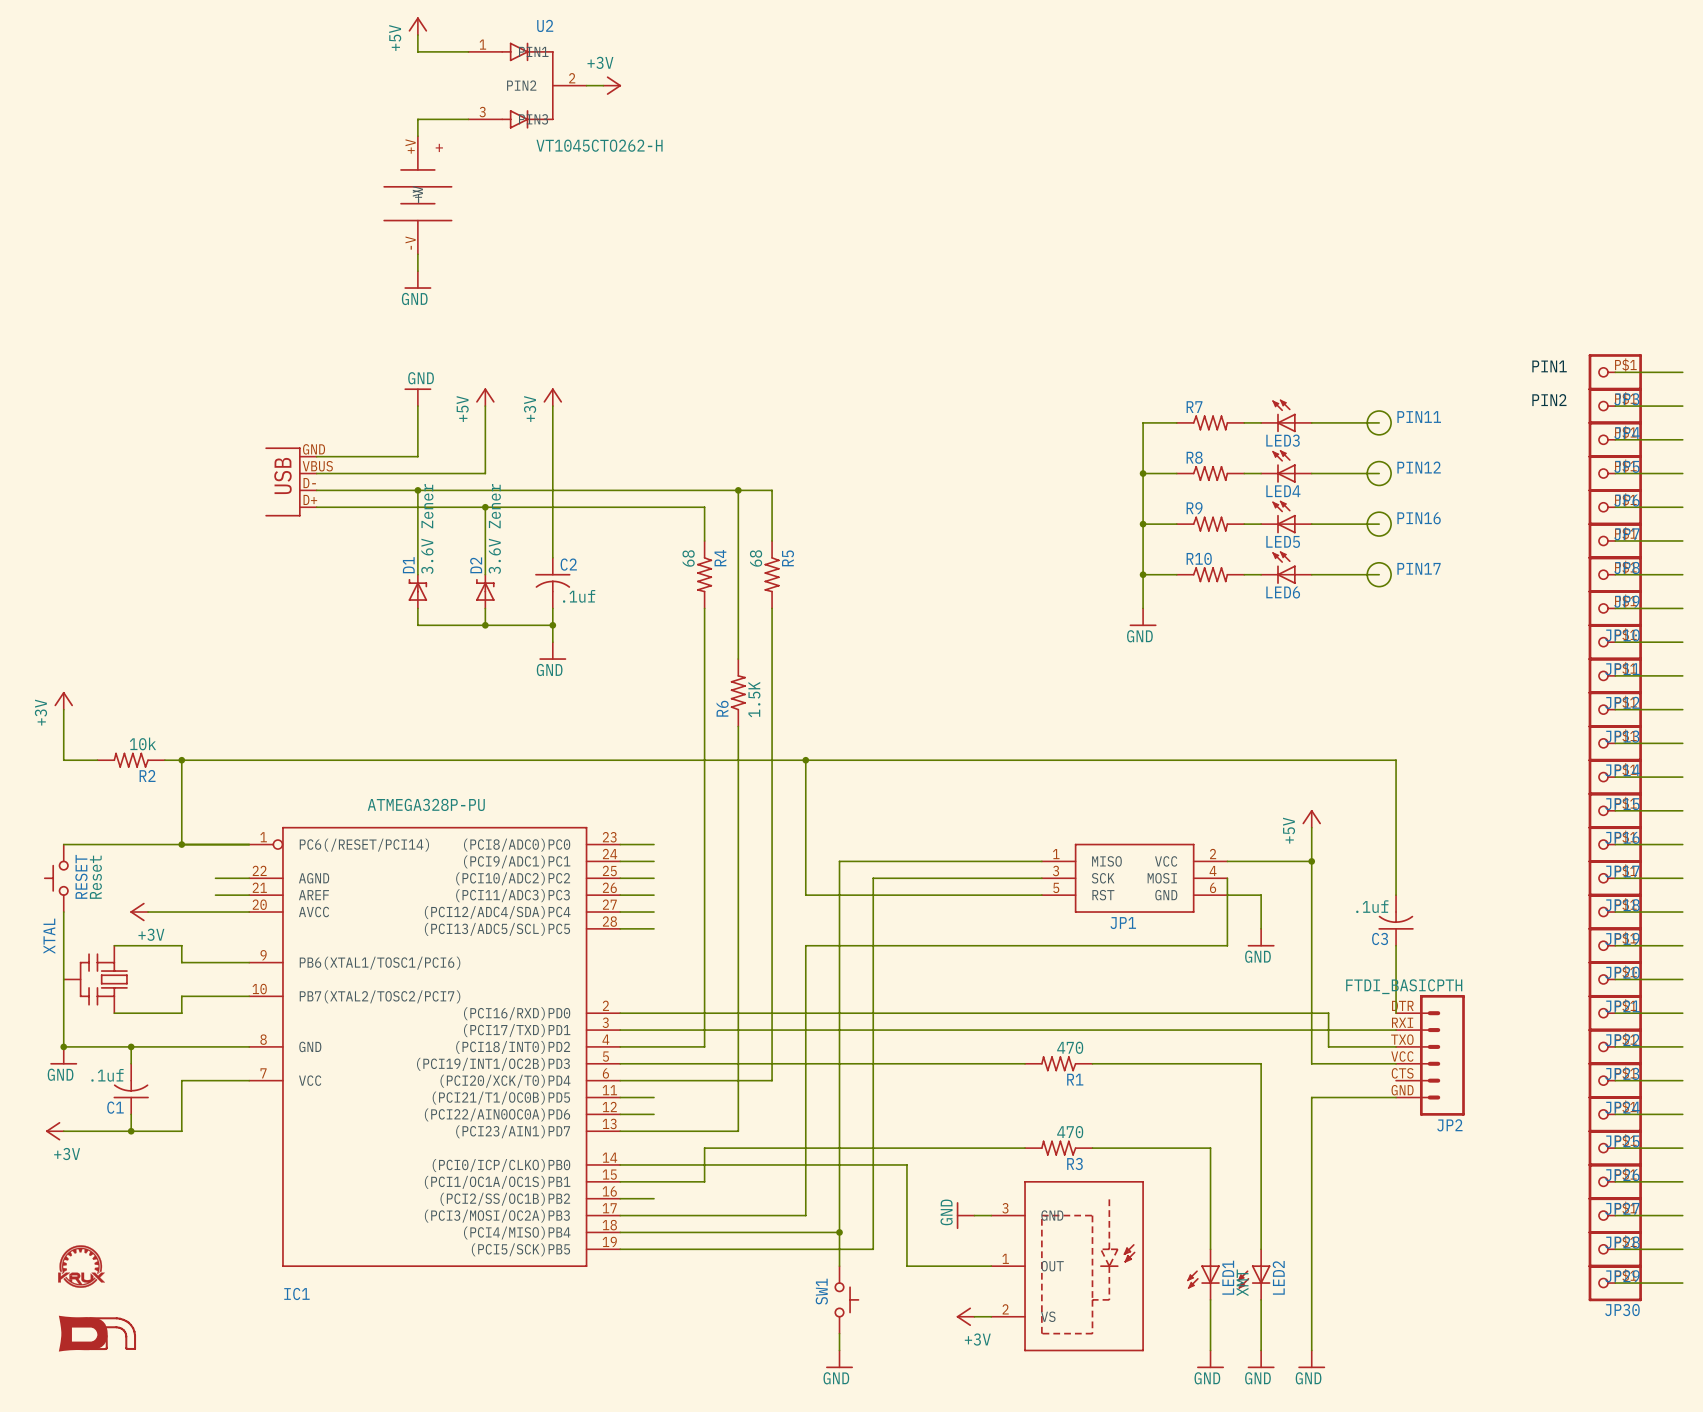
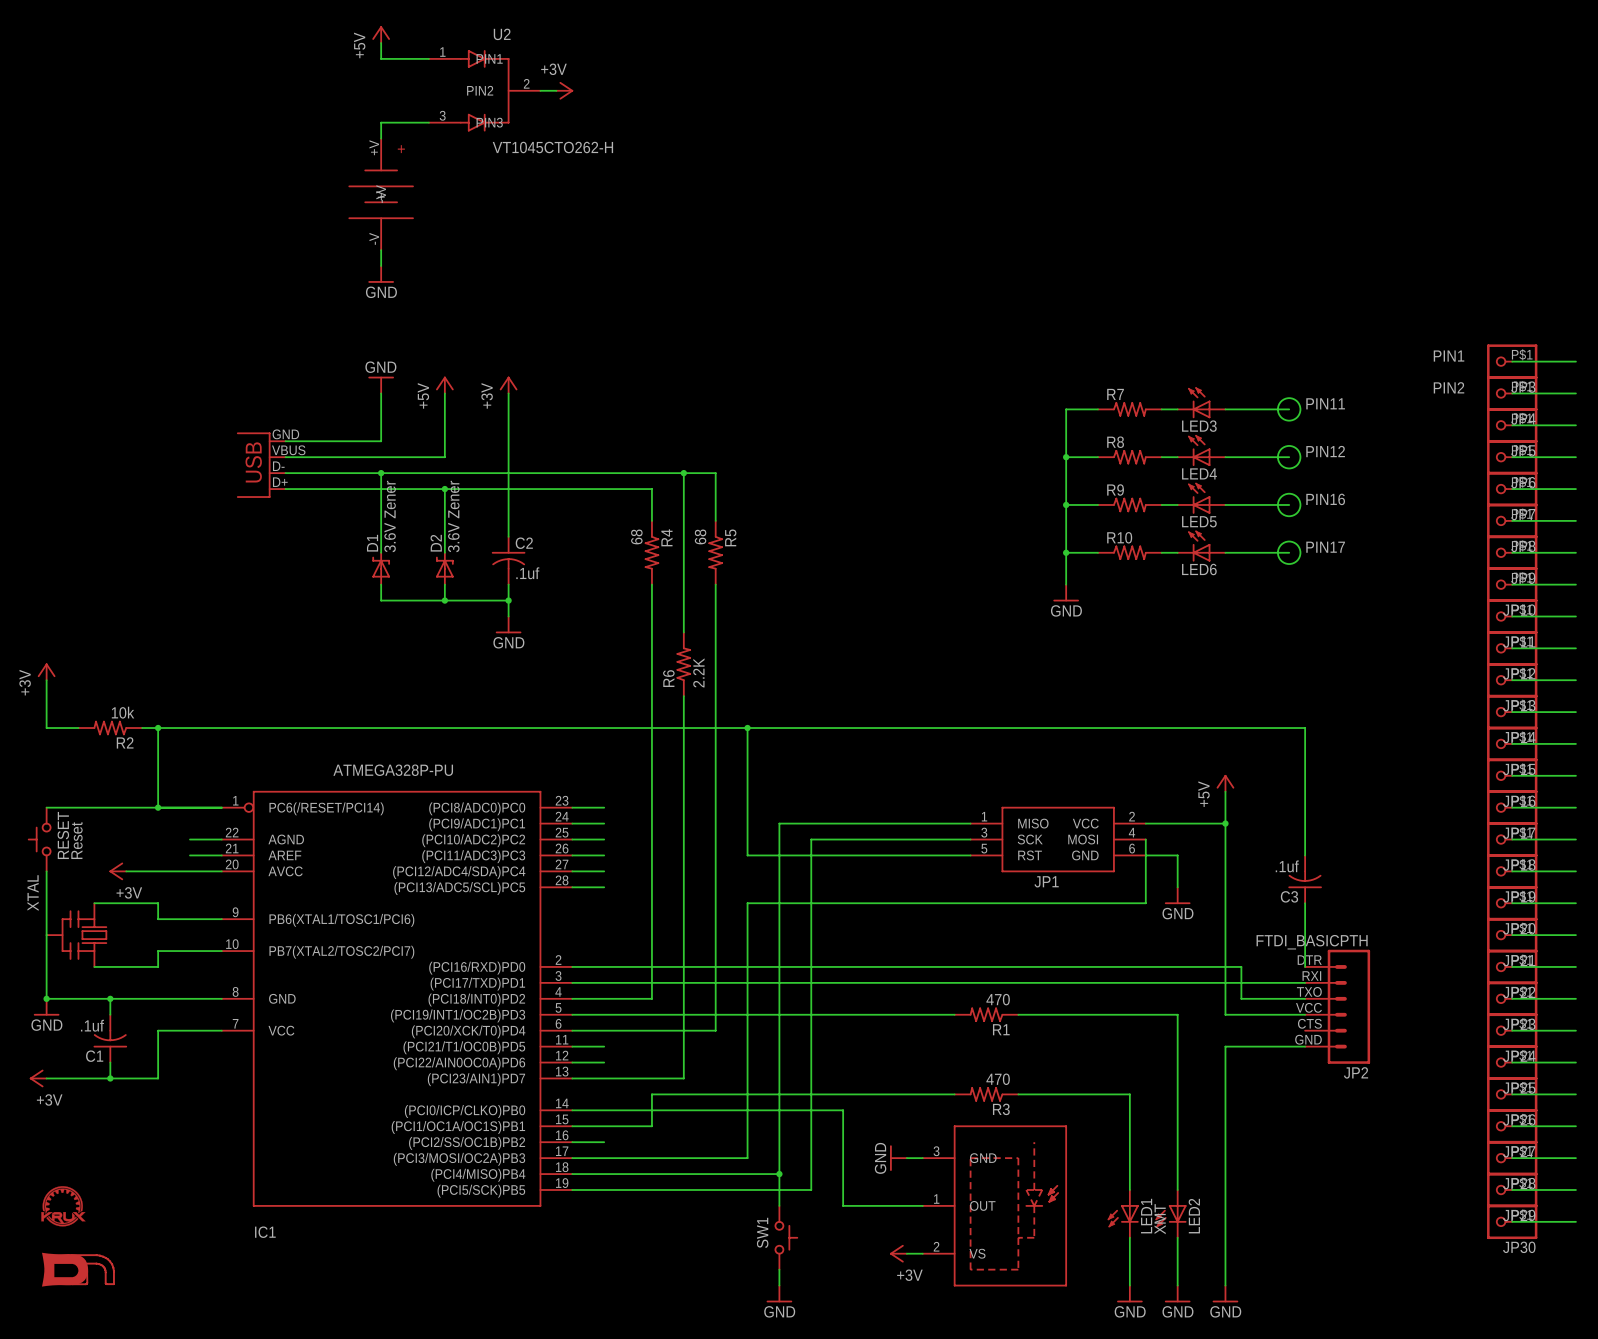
R6 value: 1.5K (754, 699) -> 2.2K (698, 672)

